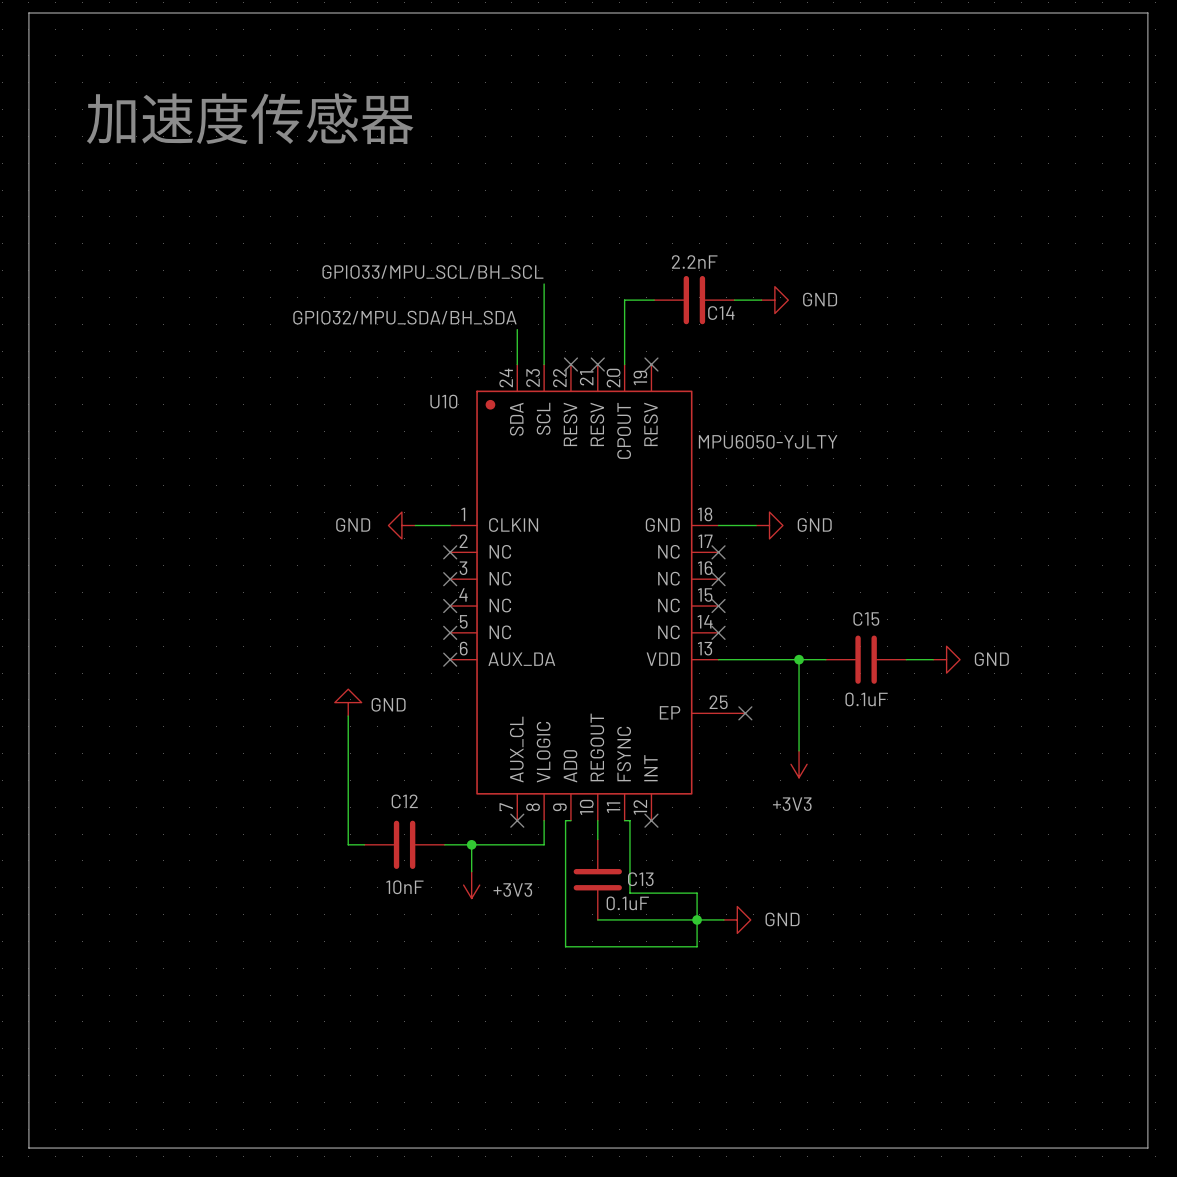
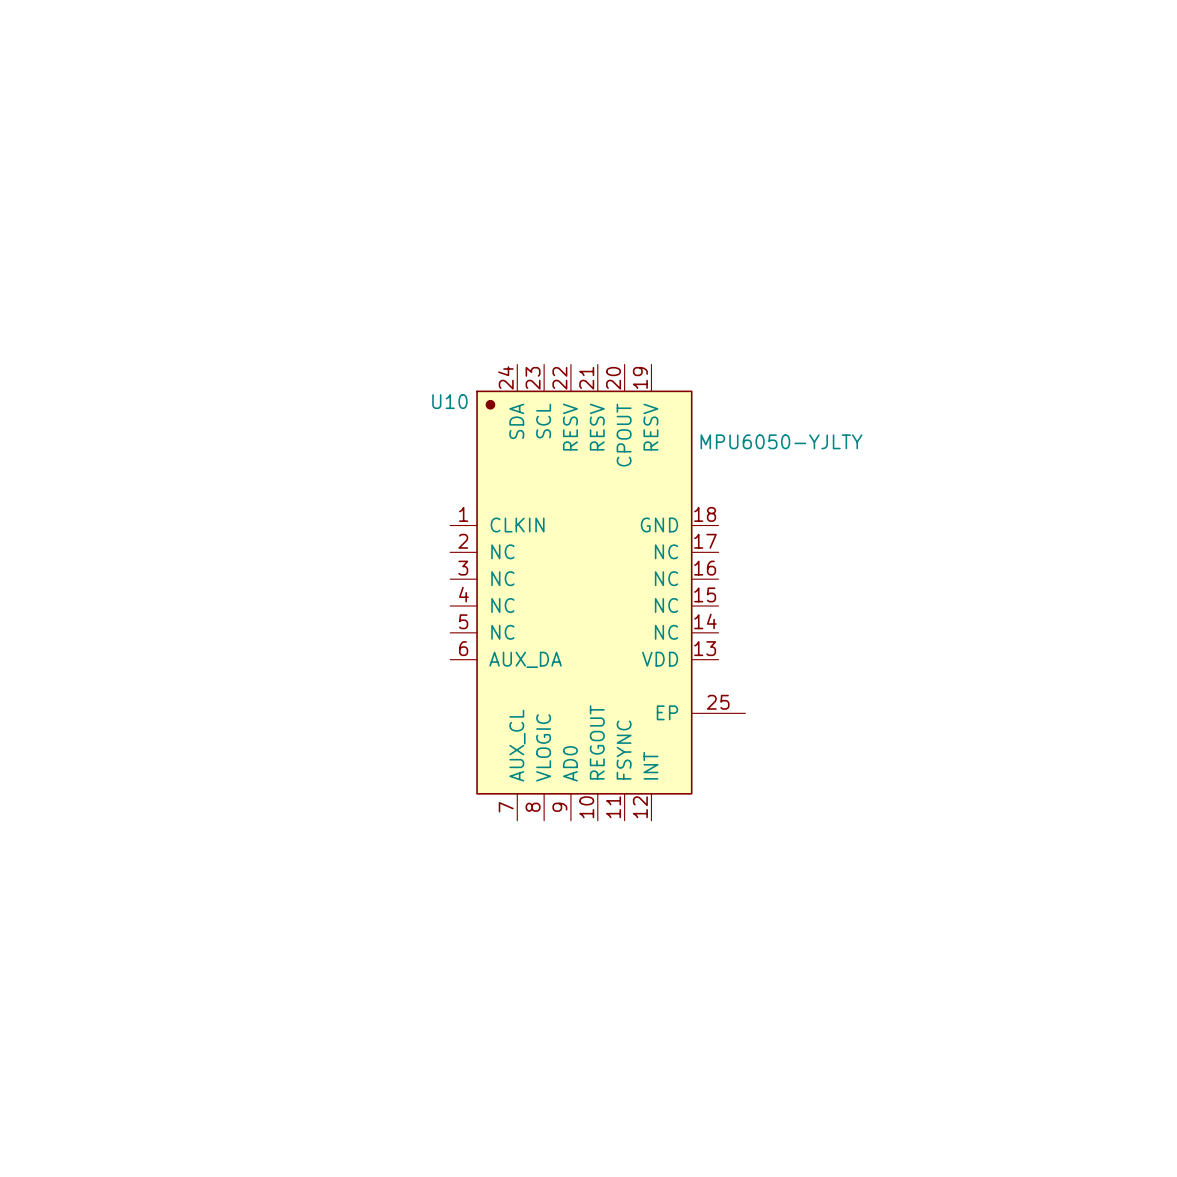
line: (28, 13) (1147, 13) (1147, 1148) (28, 1148) (28, 13) -> none
text: 加速度传感器 (250, 118) -> none
label: GPIO33/MPU_SCL/BH_SCL (432, 272) -> none
wire: (544, 284) (544, 364) -> none
wire: (654, 300) (624, 300) (624, 364) -> none
C14: 2.2nF (694, 300) -> none
wire: (734, 300) (761, 300) -> none
power symbol: GND (774, 300) -> none
label: GPIO32/MPU_SDA/BH_SDA (404, 317) -> none
wire: (517, 329) (517, 364) -> none
no-connect mark: (570, 364) -> none
no-connect mark: (597, 364) -> none
no-connect mark: (651, 364) -> none
power symbol: GND (401, 525) -> none
wire: (415, 525) (450, 525) -> none
wire: (718, 525) (756, 525) -> none
power symbol: GND (769, 525) -> none
no-connect mark: (450, 552) -> none
no-connect mark: (718, 552) -> none
no-connect mark: (450, 579) -> none
no-connect mark: (718, 579) -> none
no-connect mark: (450, 606) -> none
no-connect mark: (718, 606) -> none
no-connect mark: (450, 632) -> none
no-connect mark: (718, 632) -> none
no-connect mark: (450, 659) -> none
wire: (718, 659) (825, 659) -> none
wire: (799, 659) (799, 750) -> none
junction: (799, 659) -> none
C15: 0.1uF (866, 659) -> none
wire: (906, 659) (933, 659) -> none
power symbol: GND (946, 659) -> none
power symbol: GND (348, 702) -> none
no-connect mark: (745, 713) -> none
wire: (348, 716) (348, 844) (364, 844) -> none
power symbol: +3V3 (799, 764) -> none
no-connect mark: (517, 820) -> none
wire: (544, 820) (544, 844) (444, 844) -> none
wire: (570, 820) (565, 820) (565, 946) (697, 946) (697, 893) (629, 893) (629, 820) (624, 820) -> none
wire: (597, 820) (597, 839) -> none
no-connect mark: (651, 820) -> none
C12: 10nF (404, 844) -> none
wire: (471, 844) (471, 871) -> none
junction: (471, 844) -> none
C13: 0.1uF (597, 879) -> none
power symbol: +3V3 (471, 885) -> none
wire: (597, 919) (723, 919) -> none
junction: (697, 919) -> none
power symbol: GND (737, 919) -> none

